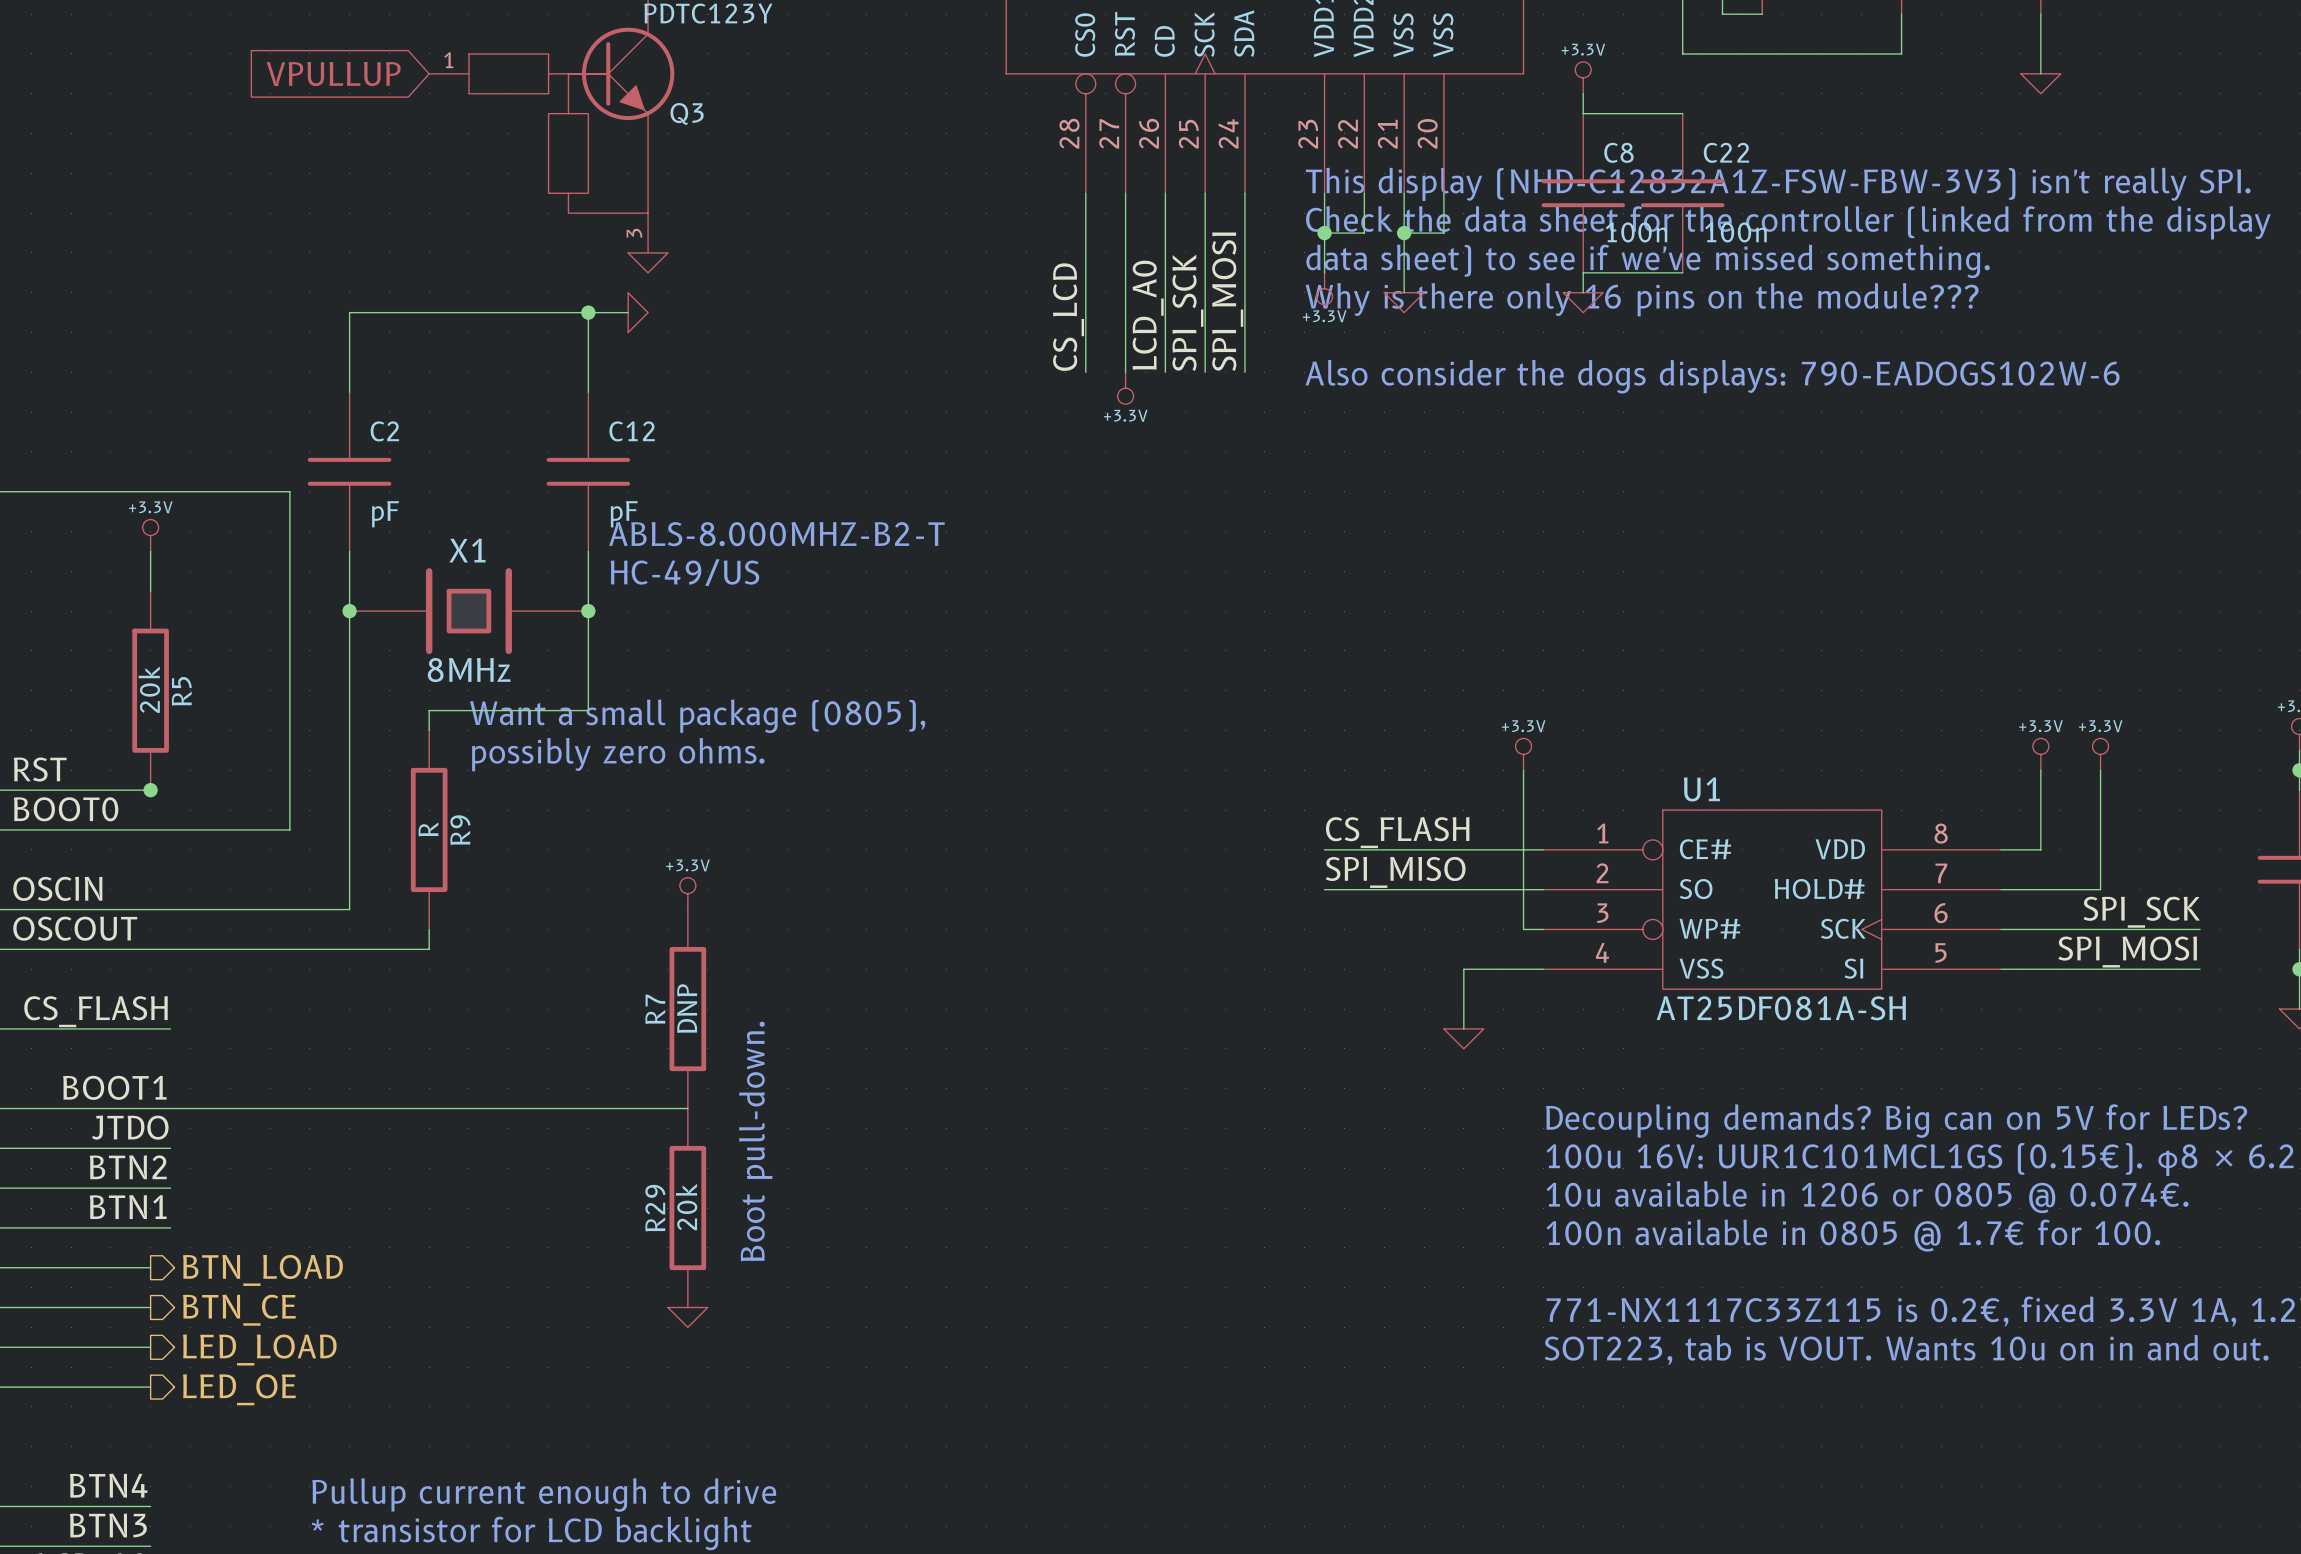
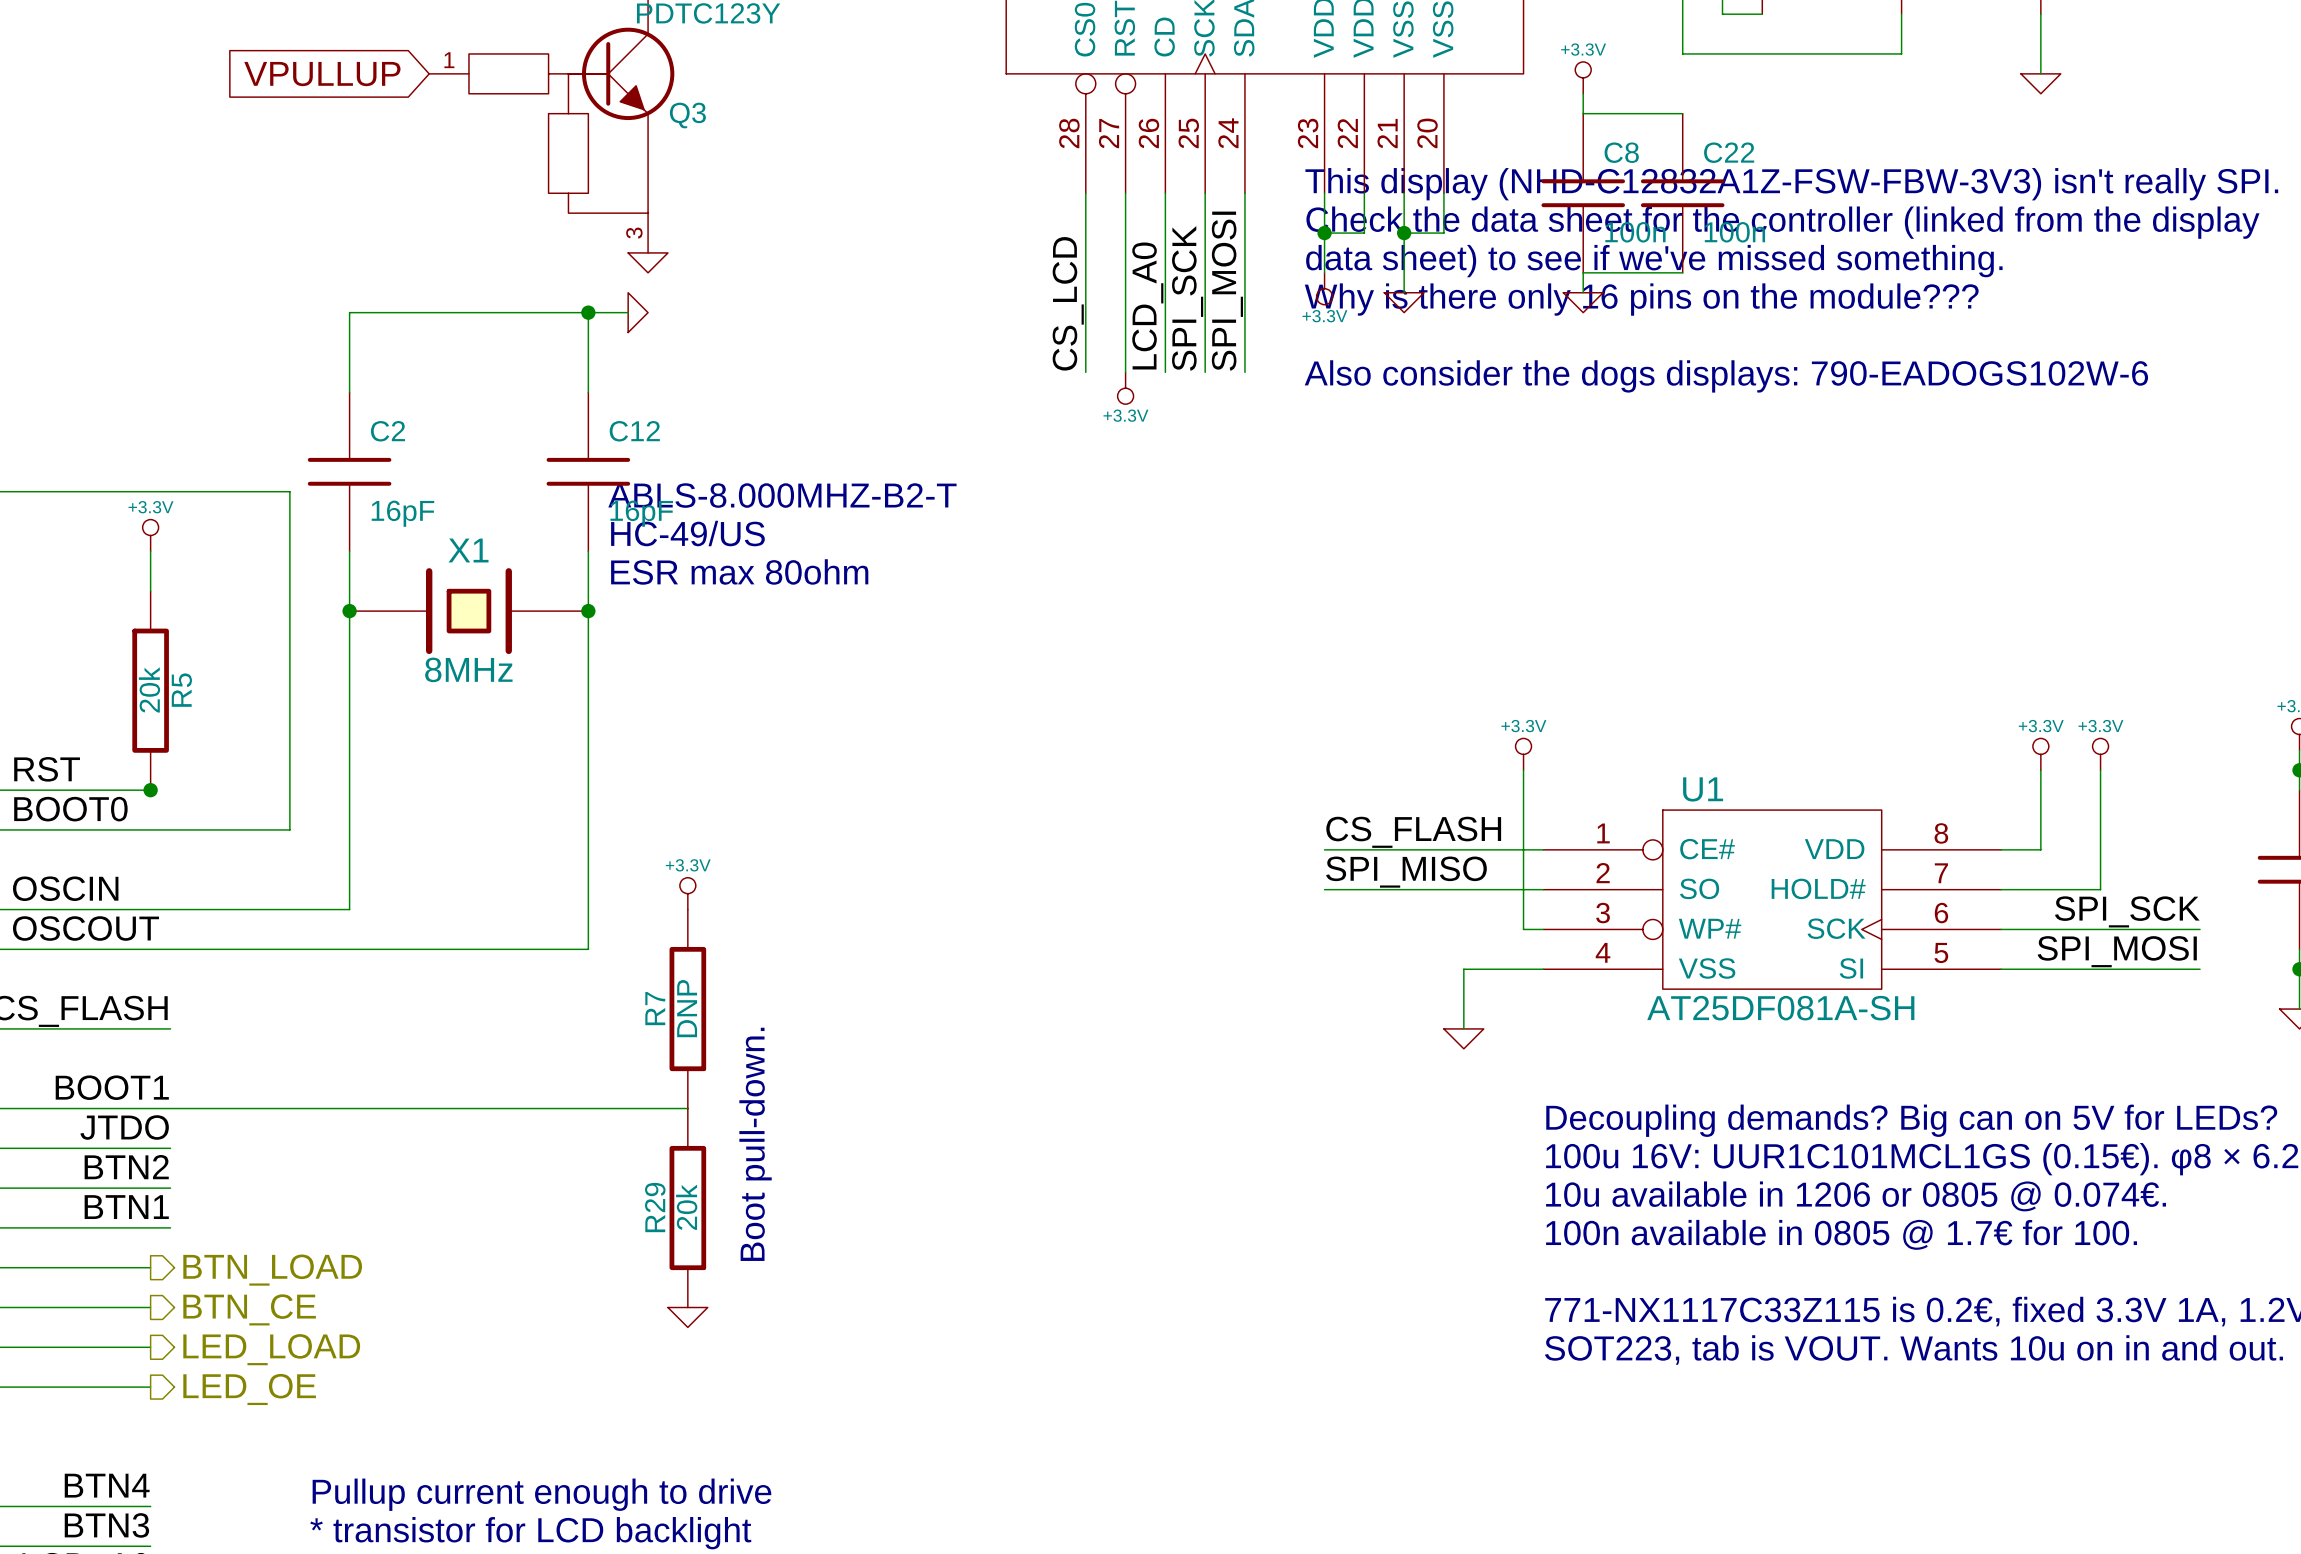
text: none -> ABLS-8.000MHZ-B2-T (782, 495)
C2 value: pF (385, 514) -> 16pF (402, 513)
C12 value: pF (624, 514) -> 16pF (641, 513)
text: ABLS-8.000MHZ-B2-T (776, 534) -> HC-49/US (687, 533)
text: HC-49/US (684, 572) -> ESR max 80ohm (739, 571)
wire: (588, 710) (429, 710) (429, 730) -> (588, 710) (588, 949) (429, 949)
text: Want a small package (0805), (697, 716) -> none
text: possibly zero ohms. (618, 754) -> none
R9: R (429, 829) -> none
wire: (429, 929) (429, 949) -> none

